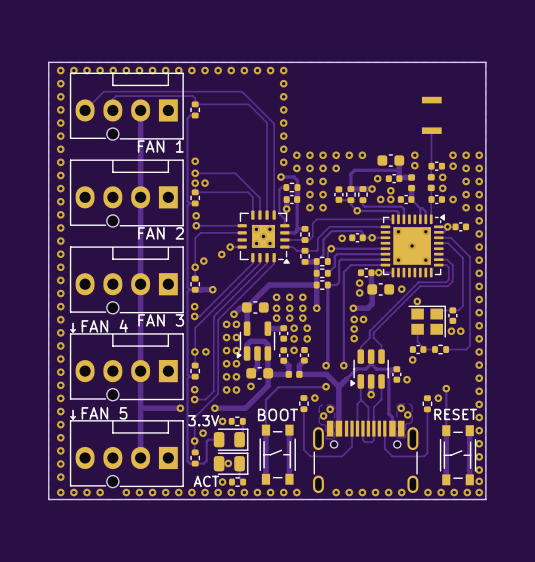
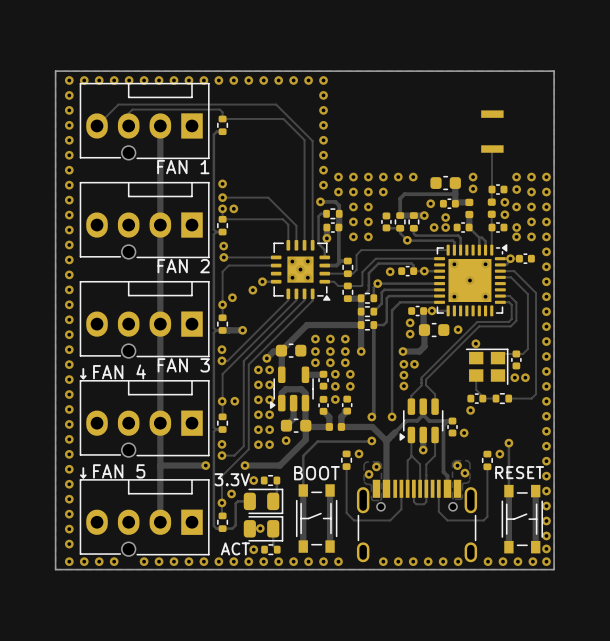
via: none -> (516, 206)
via: none -> (516, 236)

